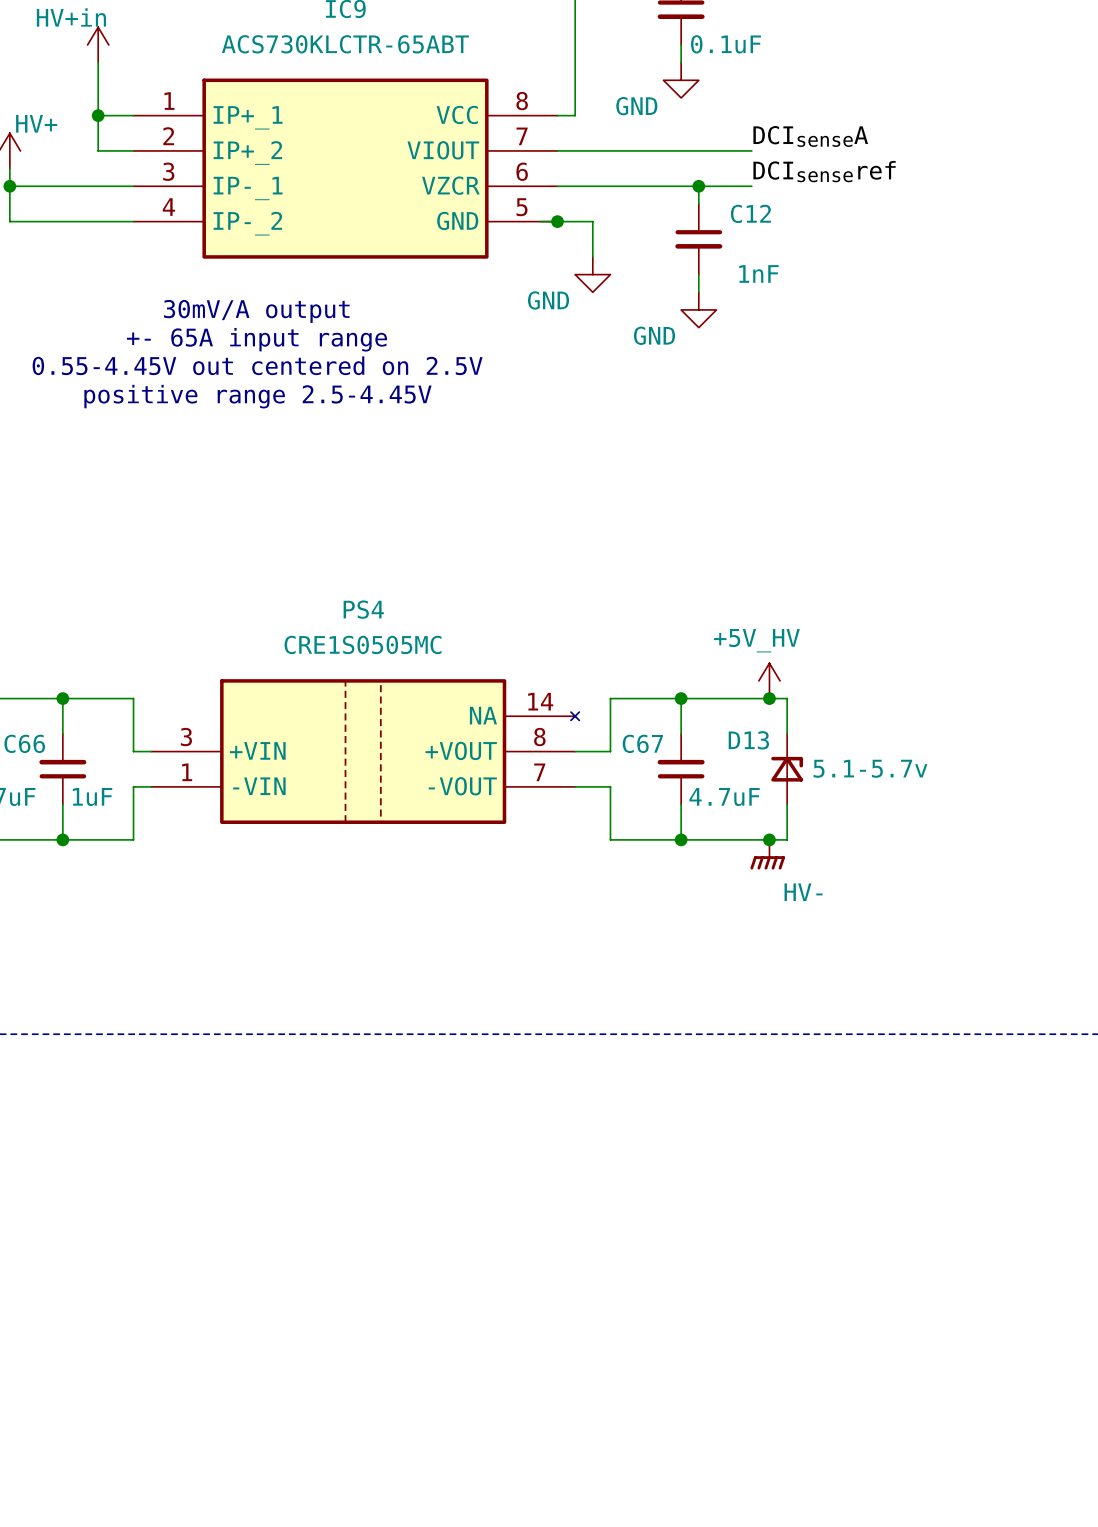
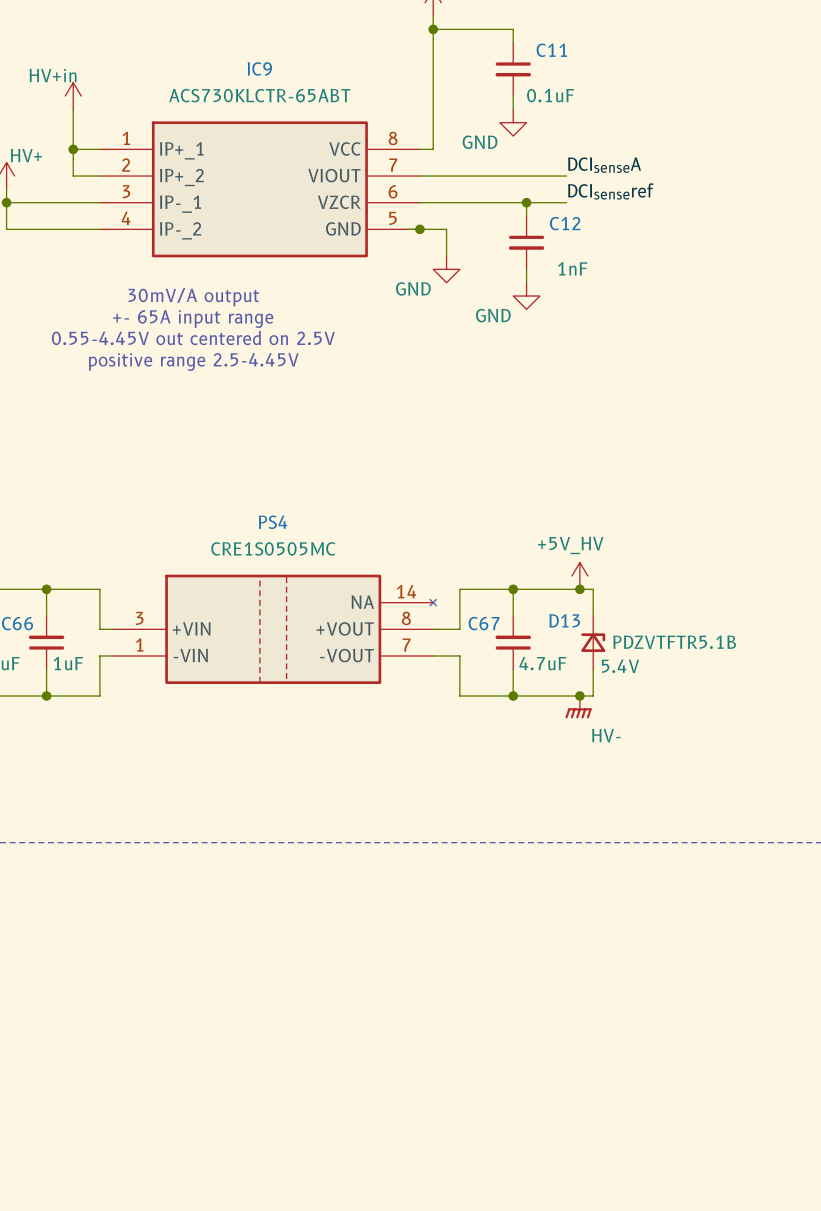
D13 value: 5.1-5.7v (870, 768) -> PDZVTFTR5.1B (674, 642)
D13 text: none -> 5.4V (620, 666)

